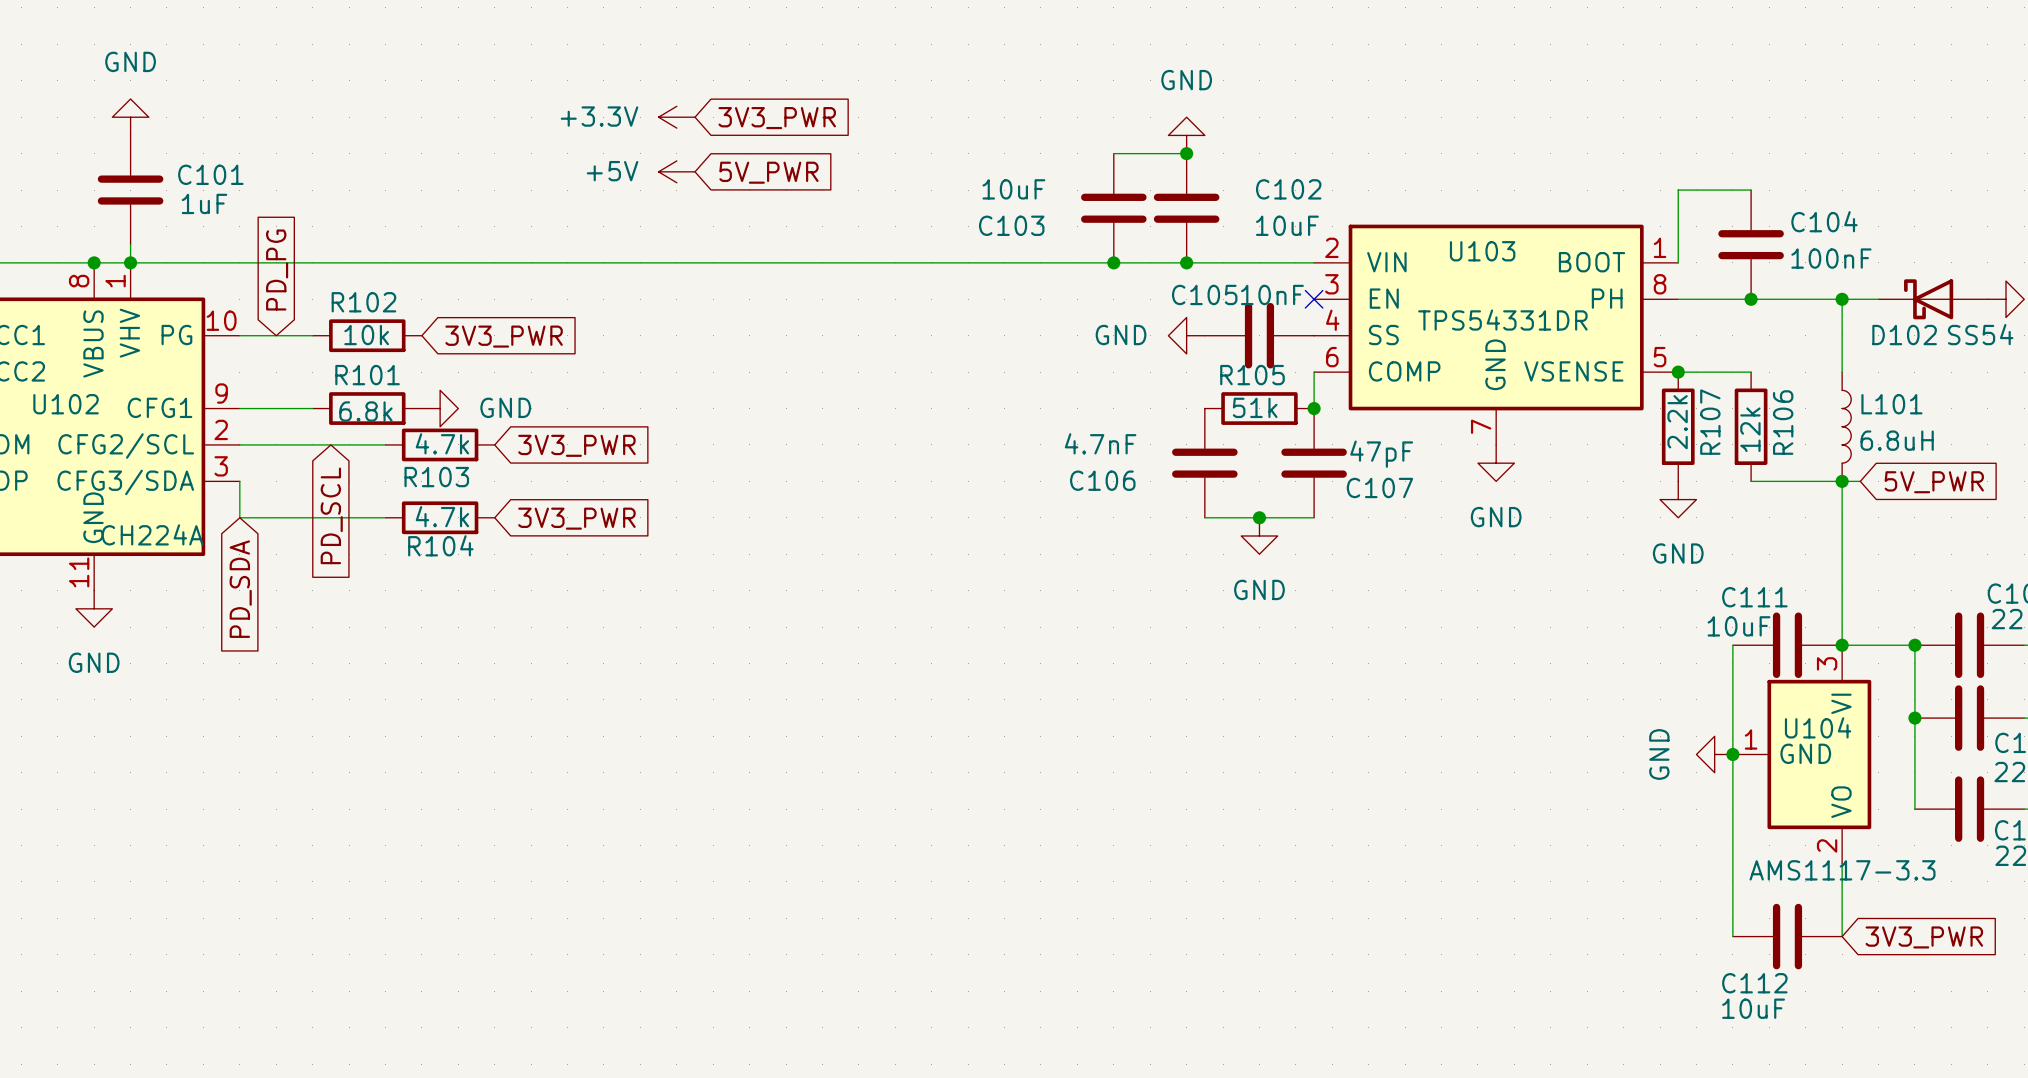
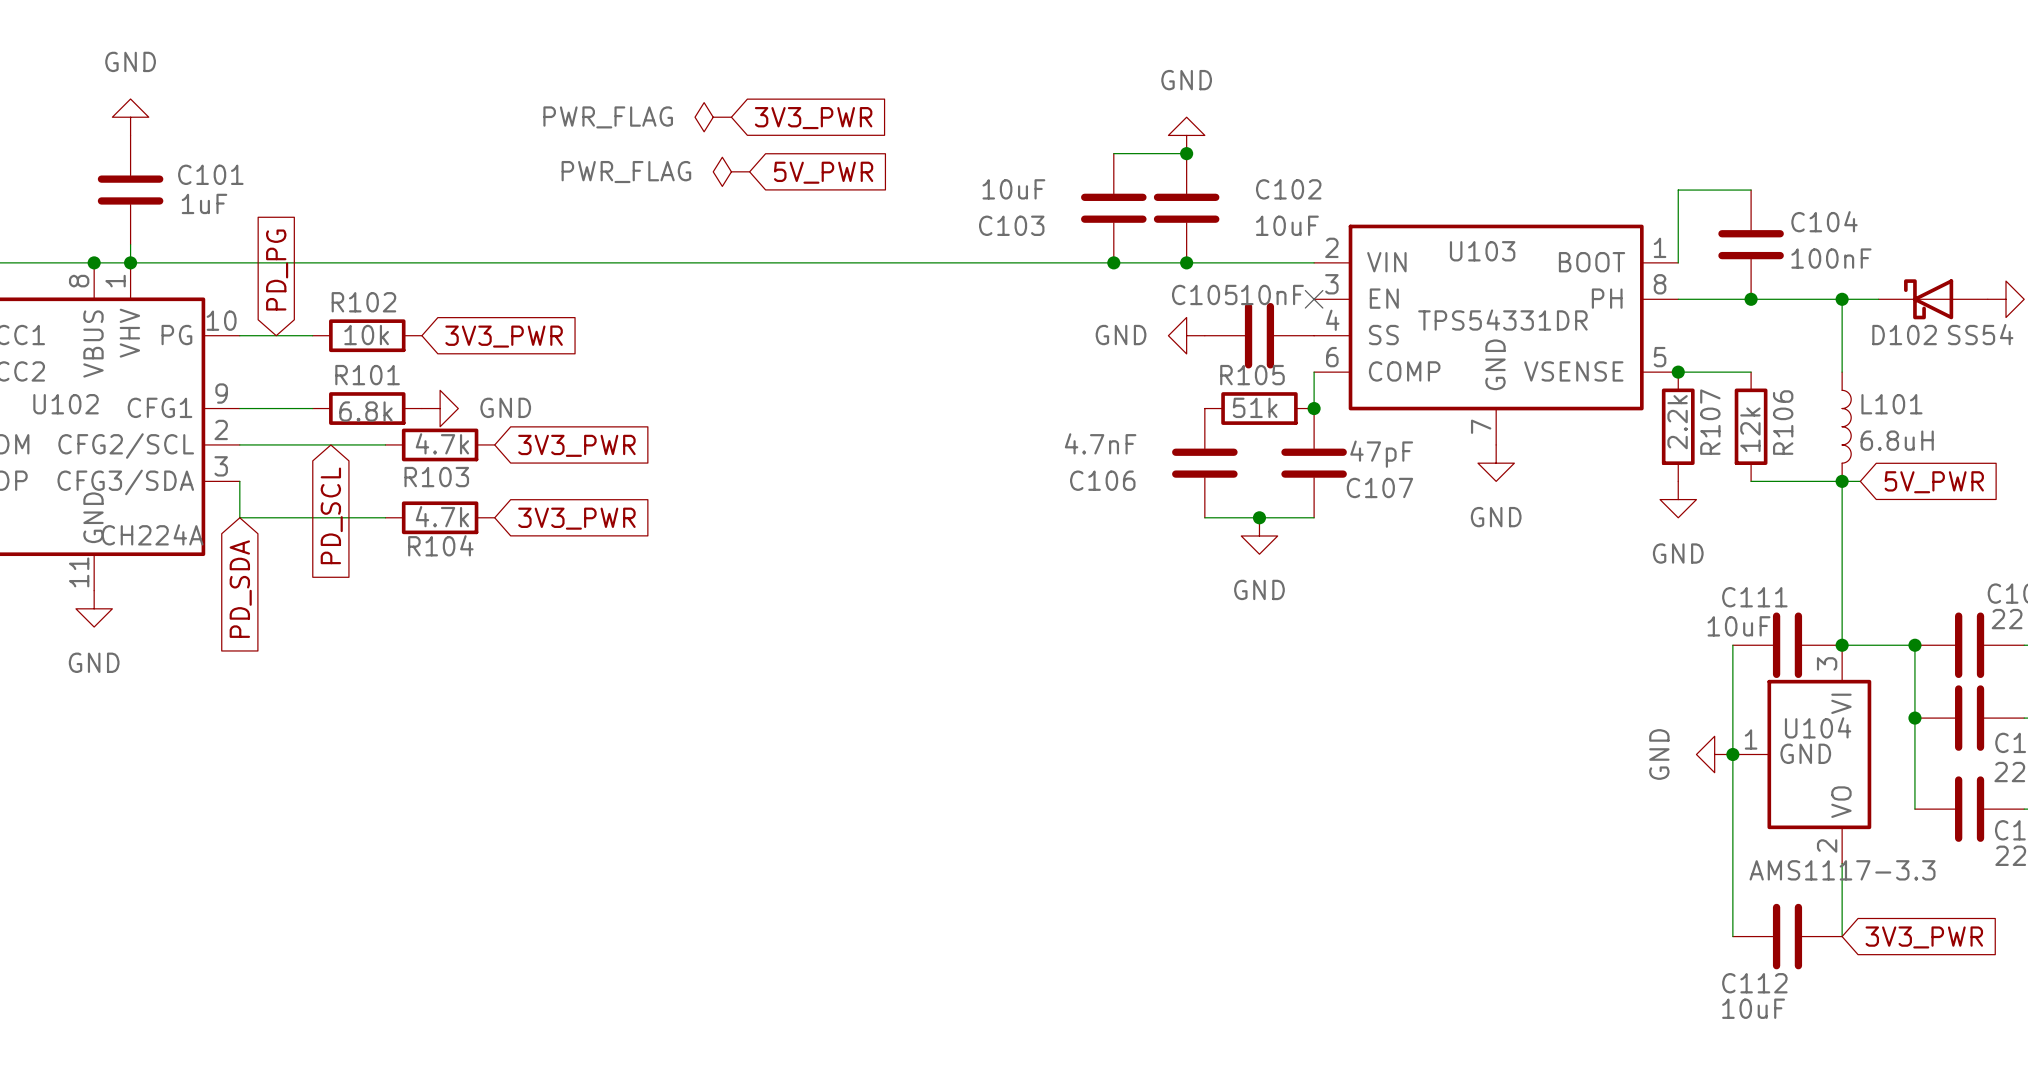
power symbol: +3.3V (676, 117) -> none
power symbol: none -> PWR_FLAG (713, 117)
global label position: 3V3_PWR (777, 118) -> 3V3_PWR (813, 118)
power symbol: +5V (676, 171) -> none
power symbol: none -> PWR_FLAG (731, 171)
global label position: 5V_PWR (768, 172) -> 5V_PWR (823, 172)

